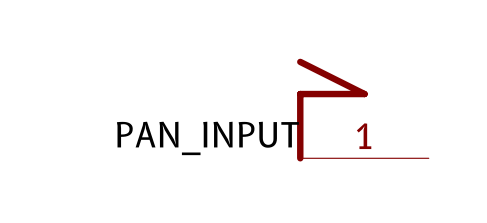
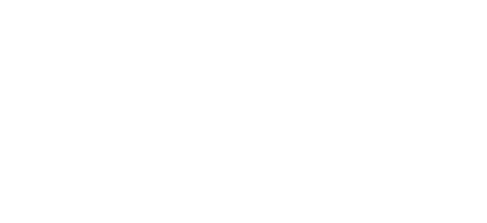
power symbol: (362, 110) -> none
label: PAN_INPUT (207, 138) -> none

